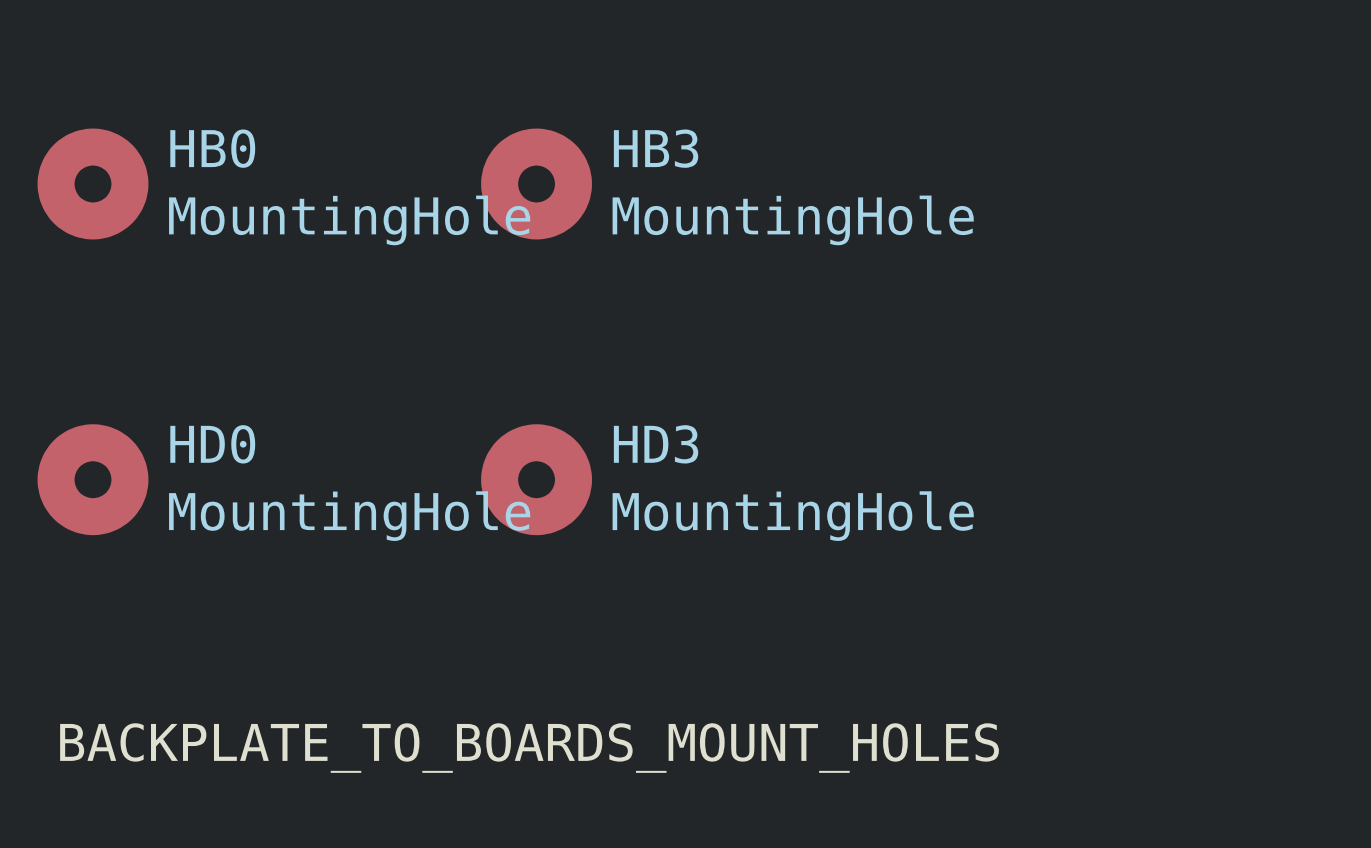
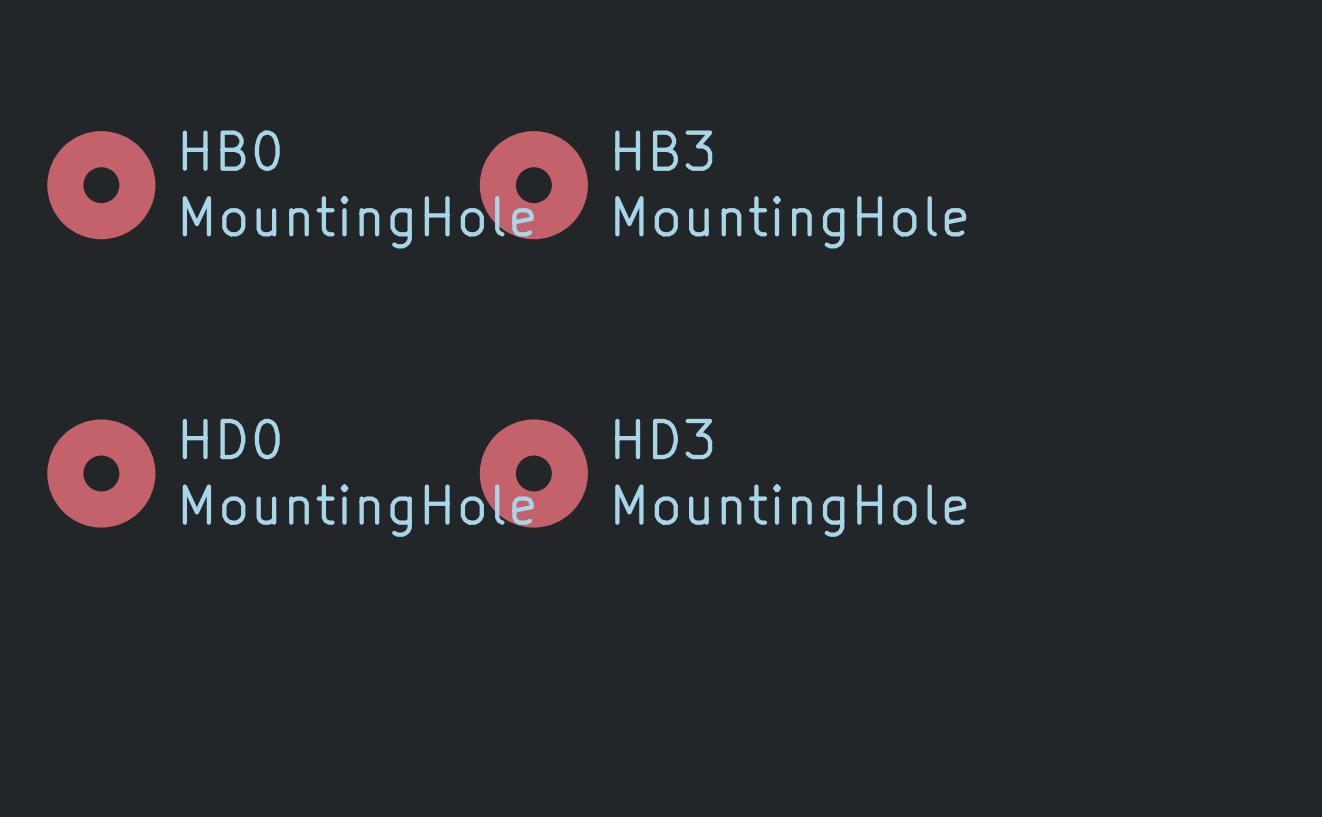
label: BACKPLATE_TO_BOARDS_MOUNT_HOLES (529, 748) -> none

